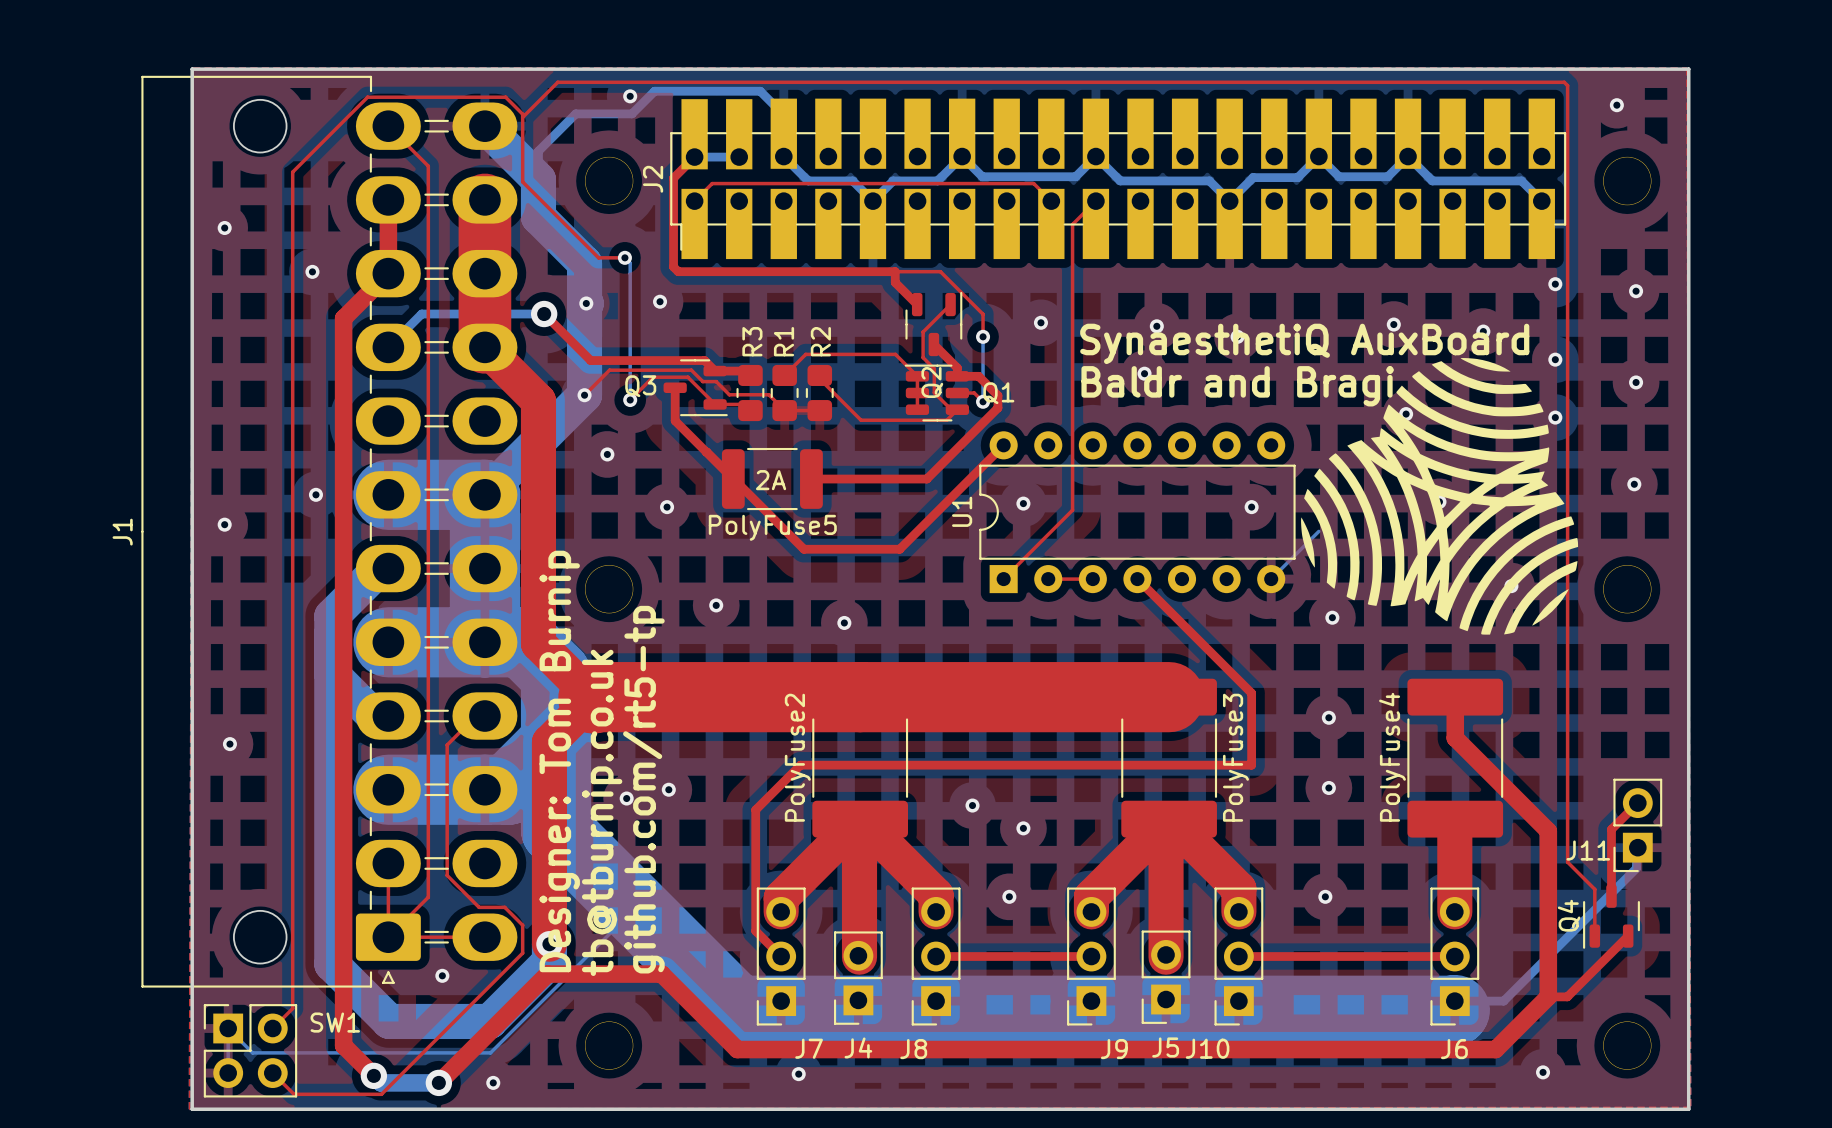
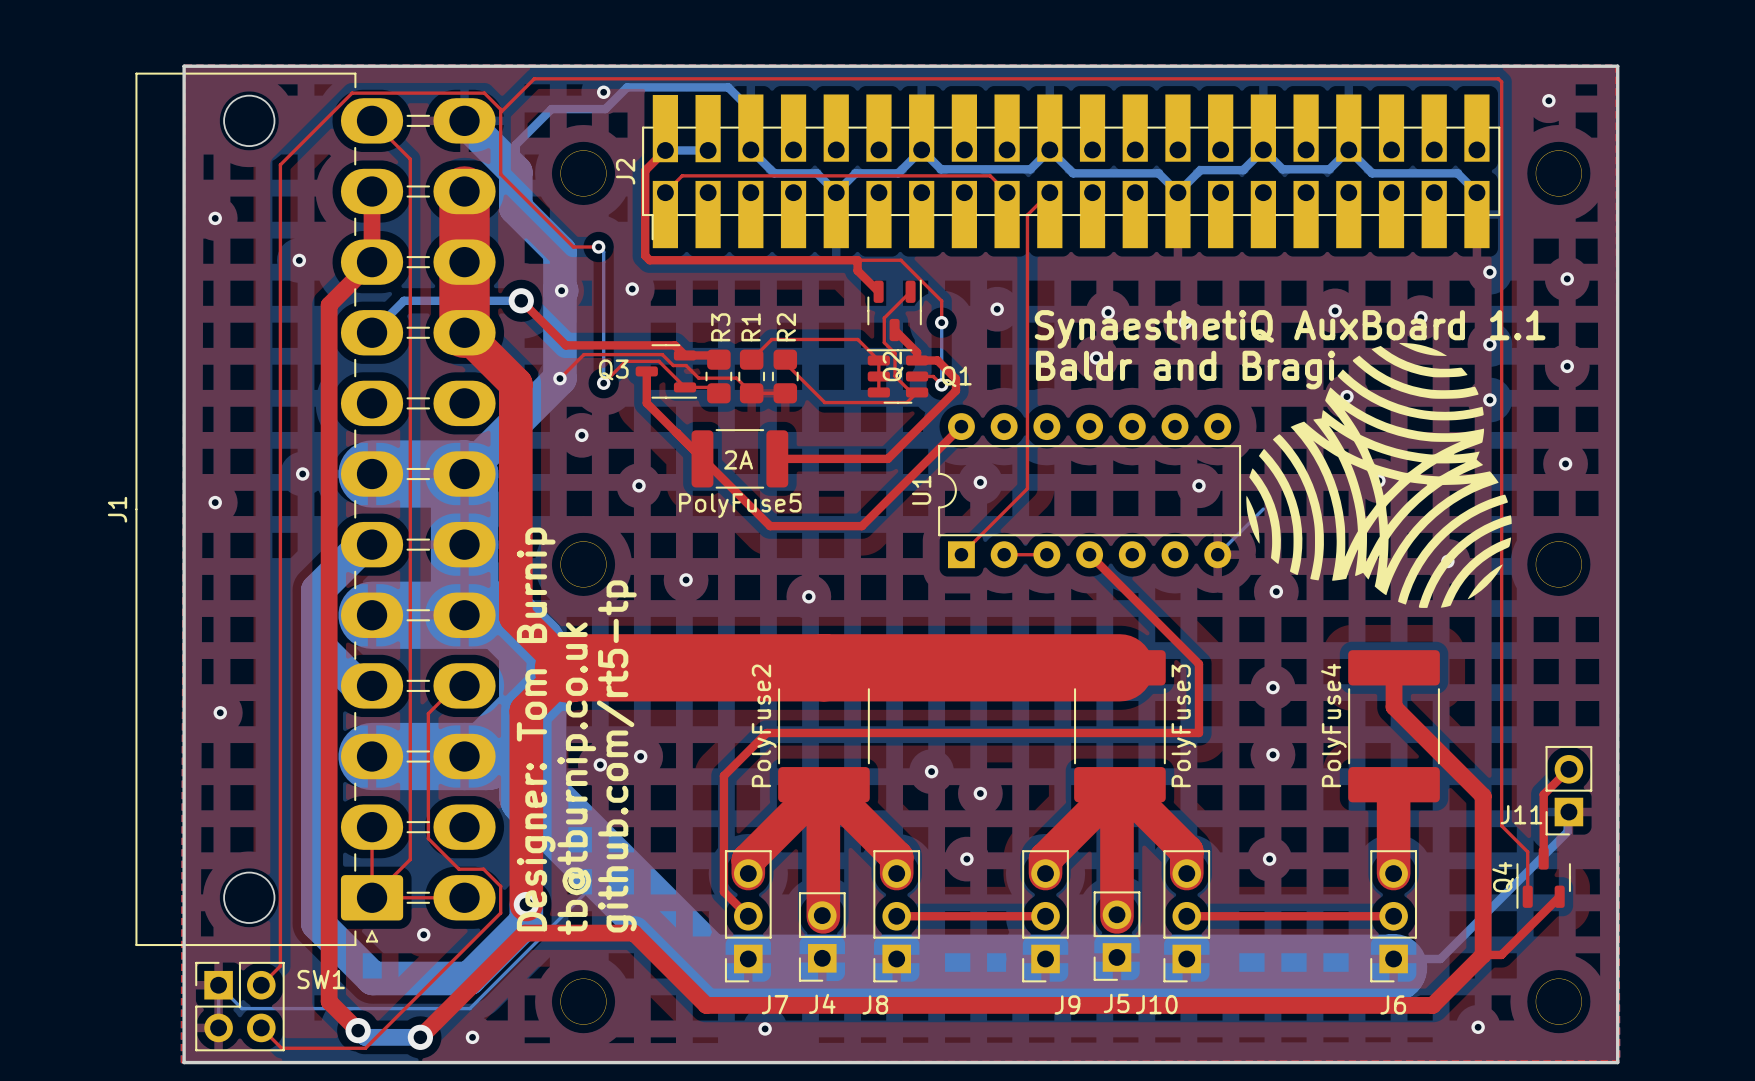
text: SynaesthetiQ AuxBoard (1304, 343) -> SynaesthetiQ AuxBoard 1.1 (1290, 329)

